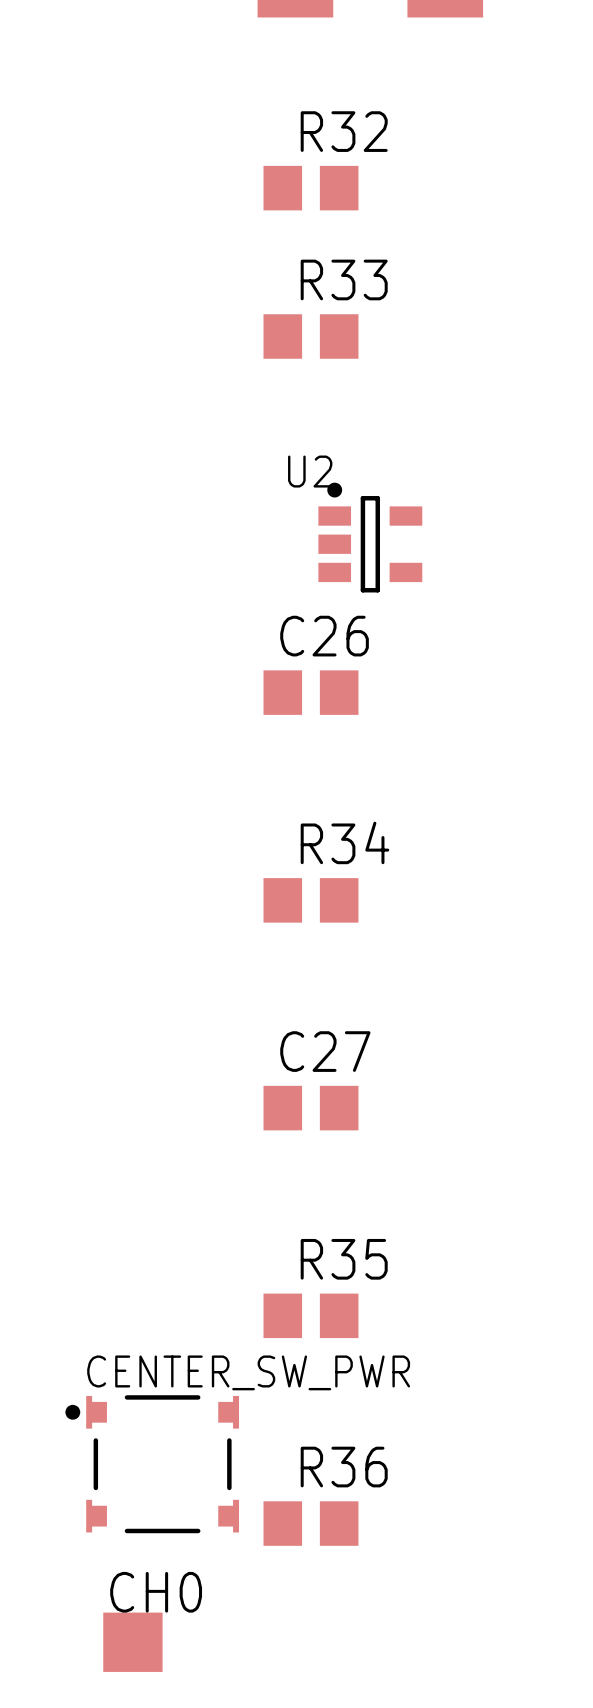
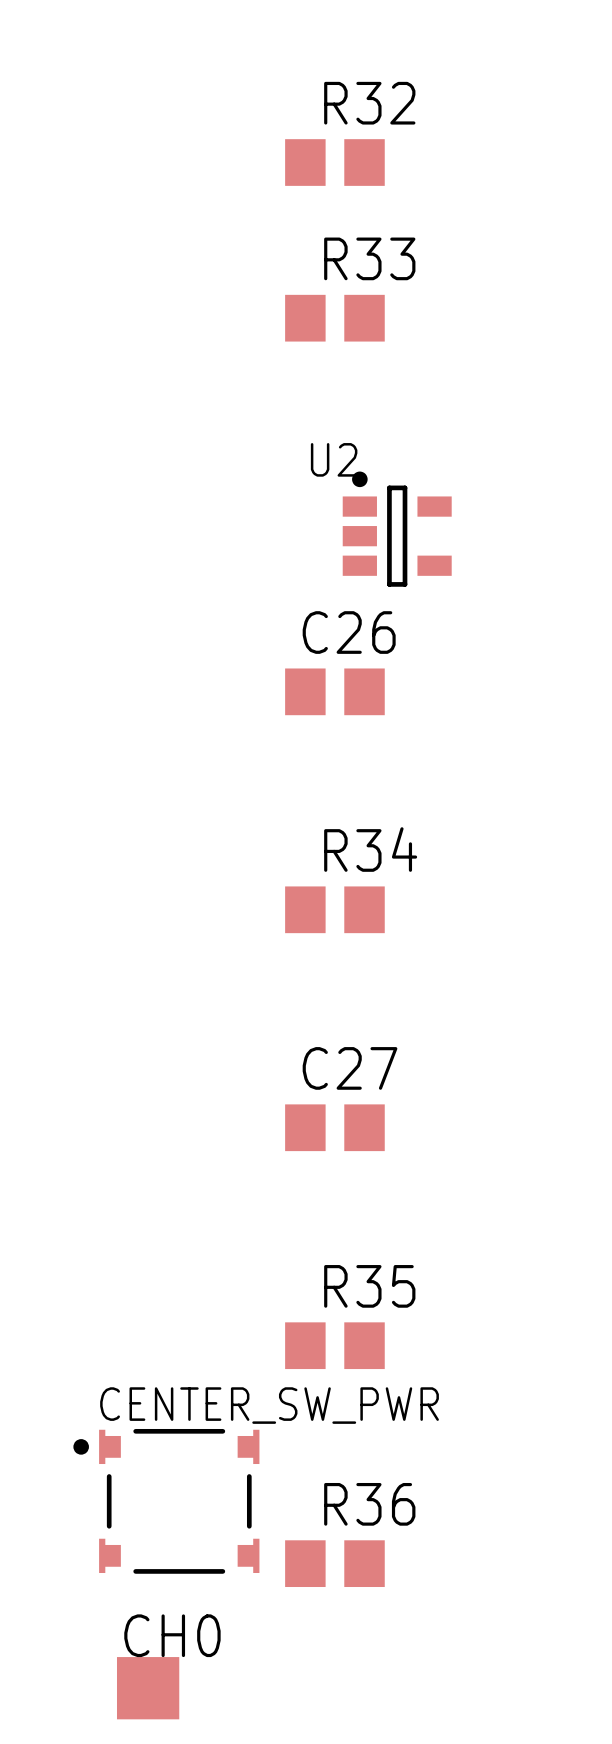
CENTER_SW_PWR footprint: [65, 1395, 240, 1534] -> [73, 1428, 260, 1574]

